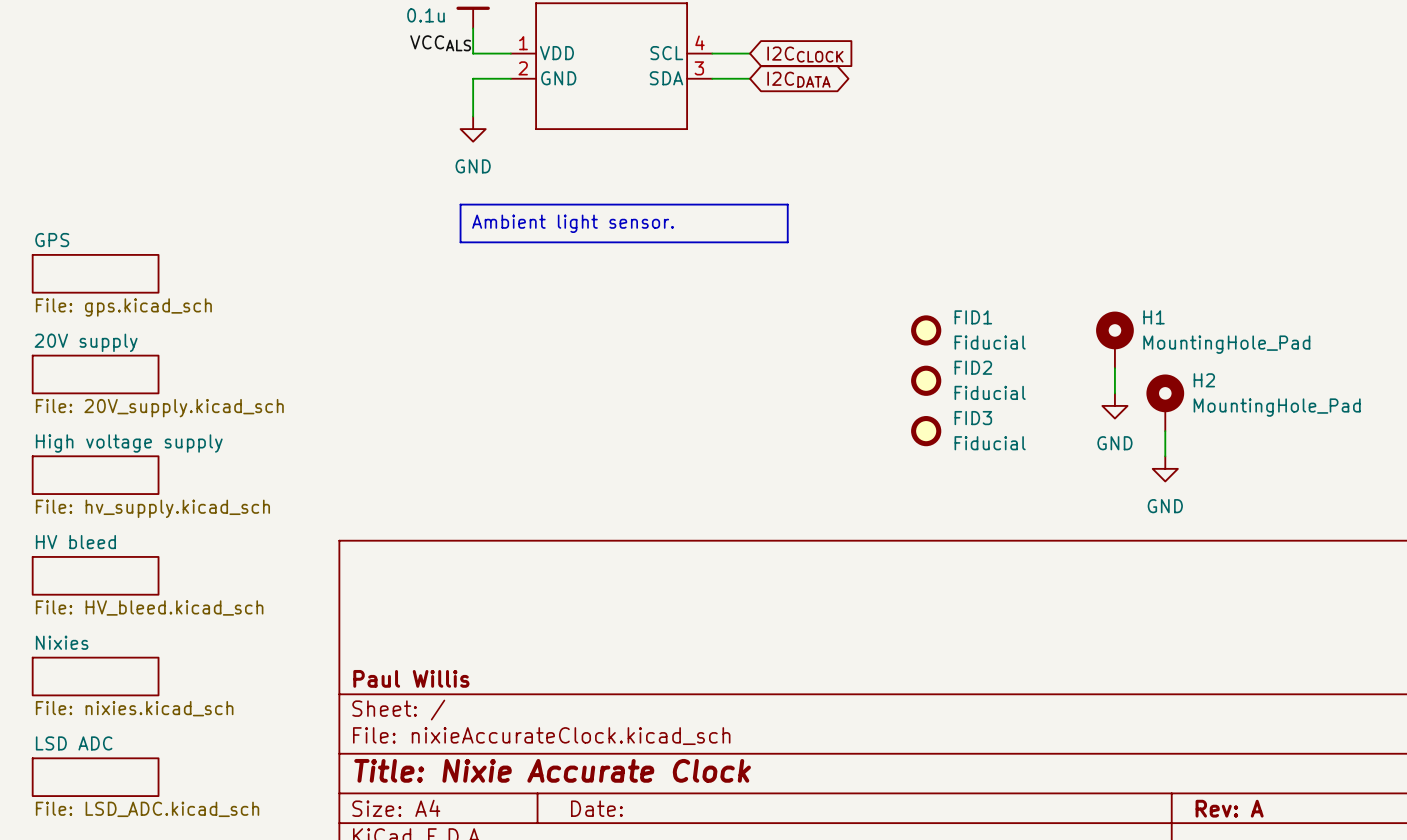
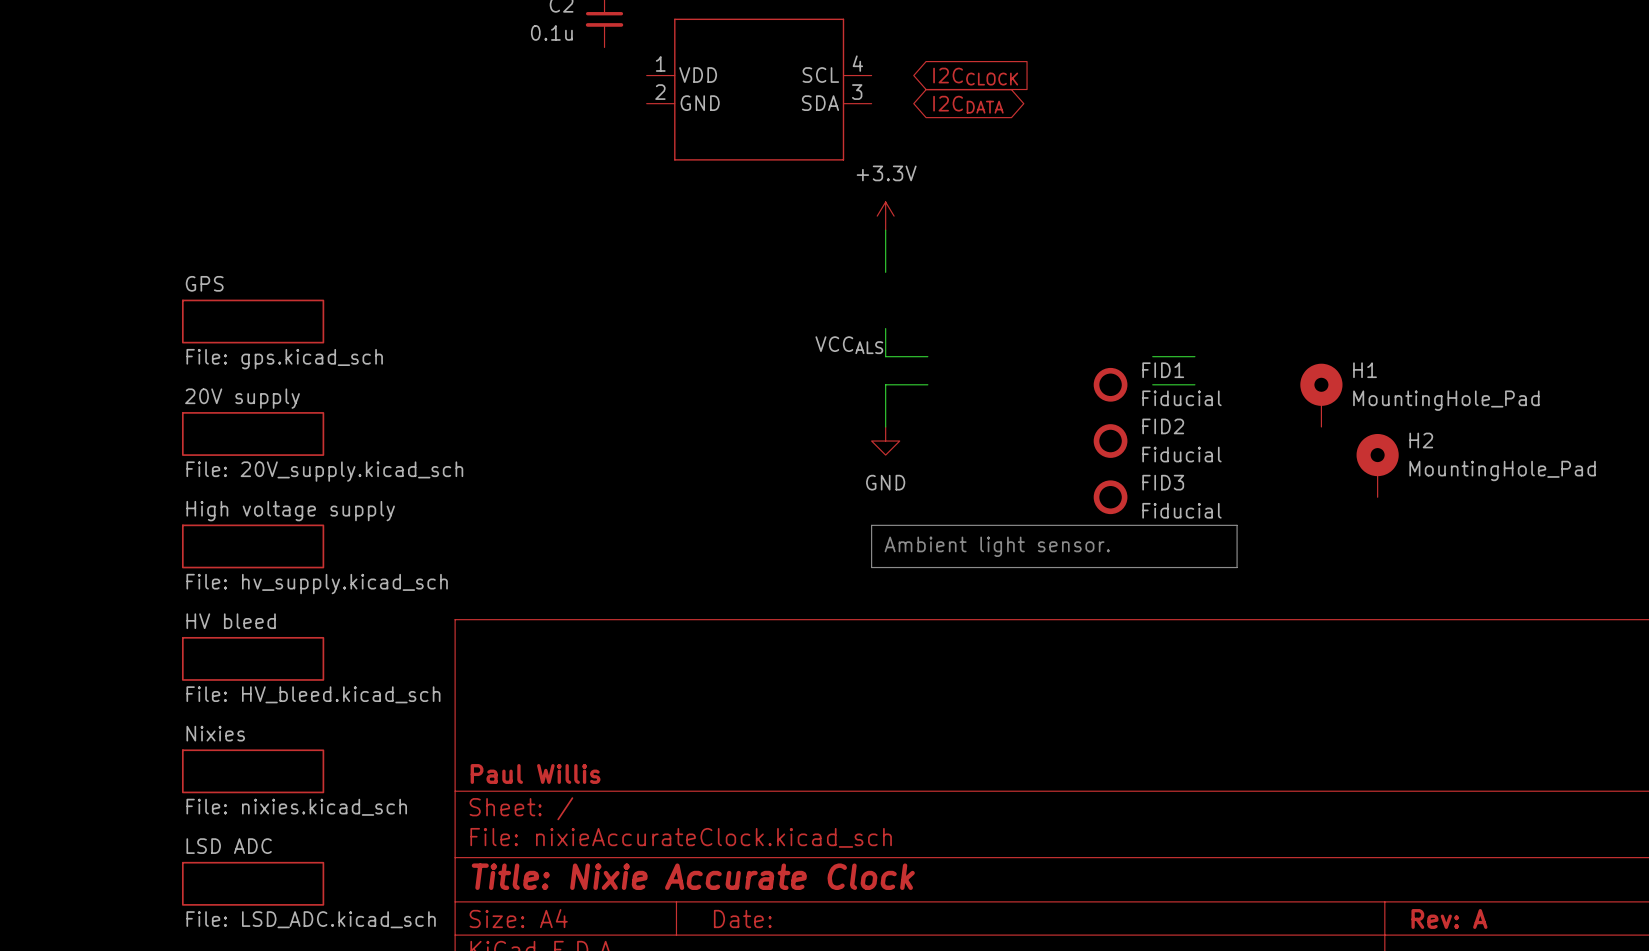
wire: (473, 28) (473, 53) (510, 53) -> none
label: VCCALS (440, 43) -> none
wire: (712, 53) (750, 53) -> none
wire: (510, 78) (473, 78) (473, 116) -> none
wire: (712, 78) (750, 78) -> none
power symbol: GND (473, 129) -> none
power symbol: none -> +3.3V (885, 216)
wire: none -> (885, 230) (885, 272)
line: (460, 204) (787, 204) (787, 242) (460, 242) (460, 204) -> none
text: Ambient light sensor. (573, 223) -> none
sheet GPS position: (95, 273) -> (253, 321)
wire: none -> (885, 328) (885, 356) (927, 356)
label: none -> VCCALS (849, 345)
wire: none -> (1152, 356) (1194, 356)
wire: none -> (927, 384) (885, 384) (885, 426)
wire: none -> (1152, 384) (1194, 384)
wire: (1114, 368) (1114, 393) -> none
sheet 20V supply position: (95, 374) -> (253, 433)
power symbol: none -> GND (885, 441)
power symbol: GND (1114, 405) -> none
wire: (1165, 431) (1165, 456) -> none
line: none -> (871, 525) (1237, 525) (1237, 567) (871, 567) (871, 525)
power symbol: GND (1165, 468) -> none
sheet High voltage supply position: (95, 475) -> (253, 546)
text: none -> Ambient light sensor. (997, 546)
sheet HV bleed position: (95, 575) -> (253, 658)
sheet Nixies position: (95, 676) -> (253, 771)
sheet LSD ADC position: (95, 777) -> (253, 883)

